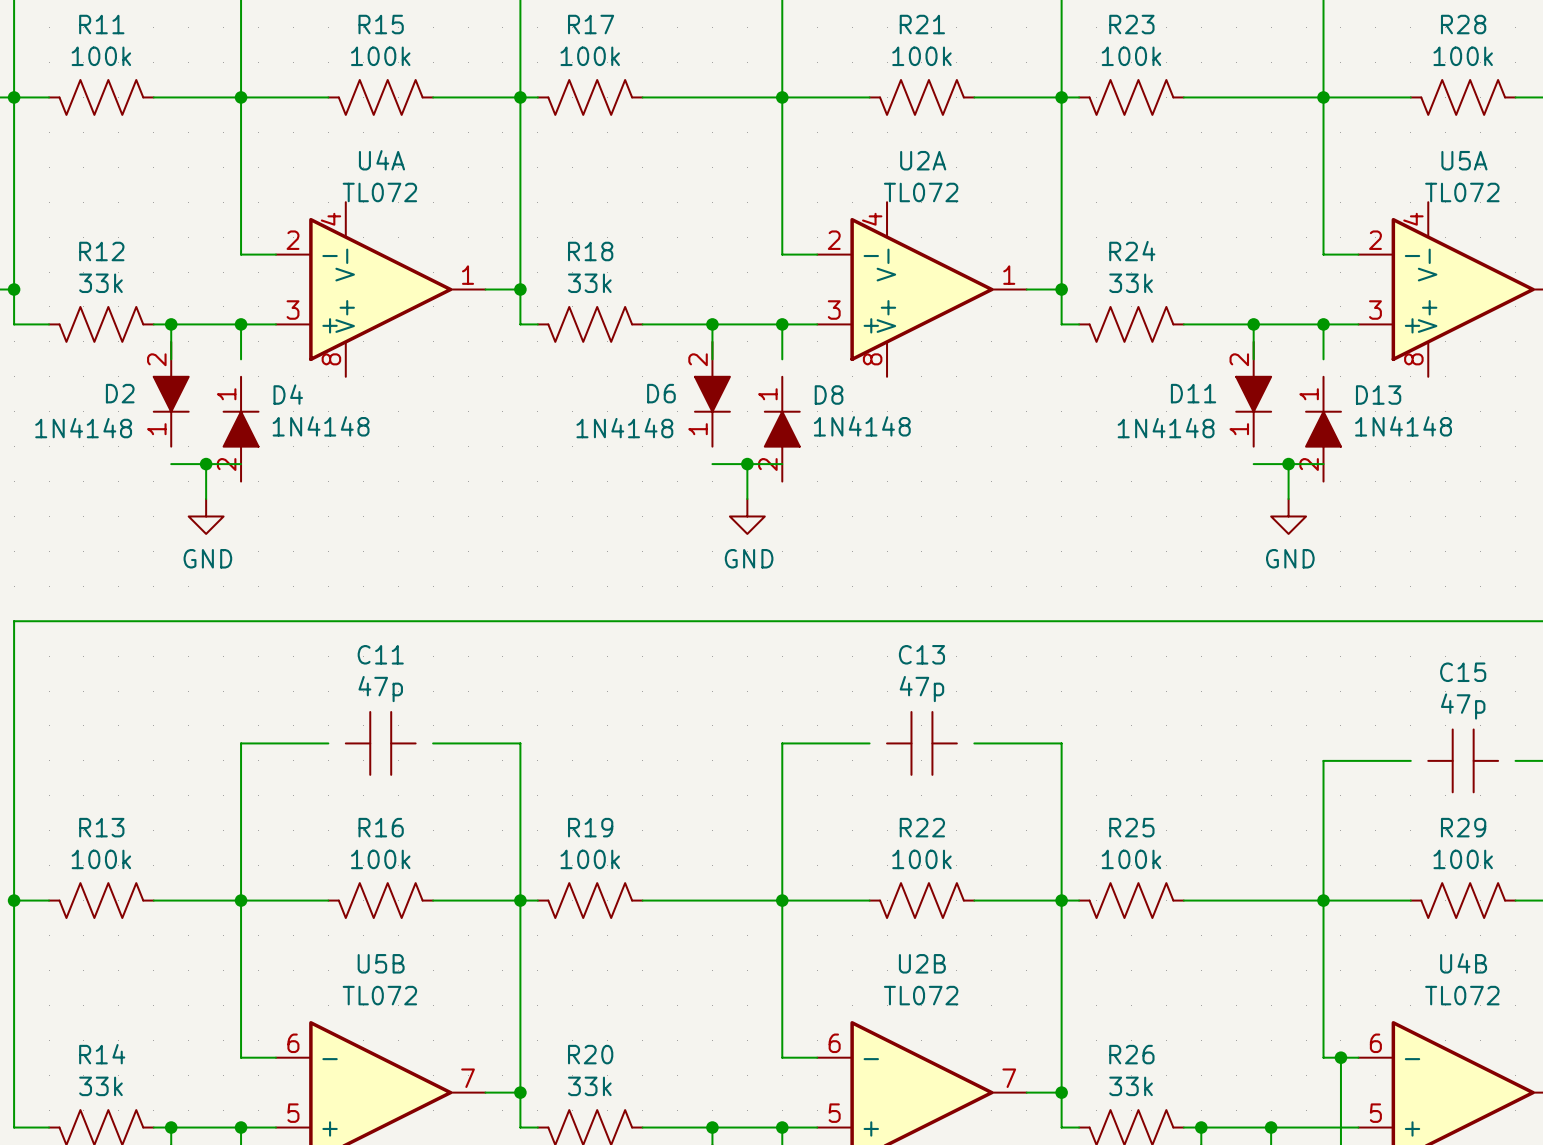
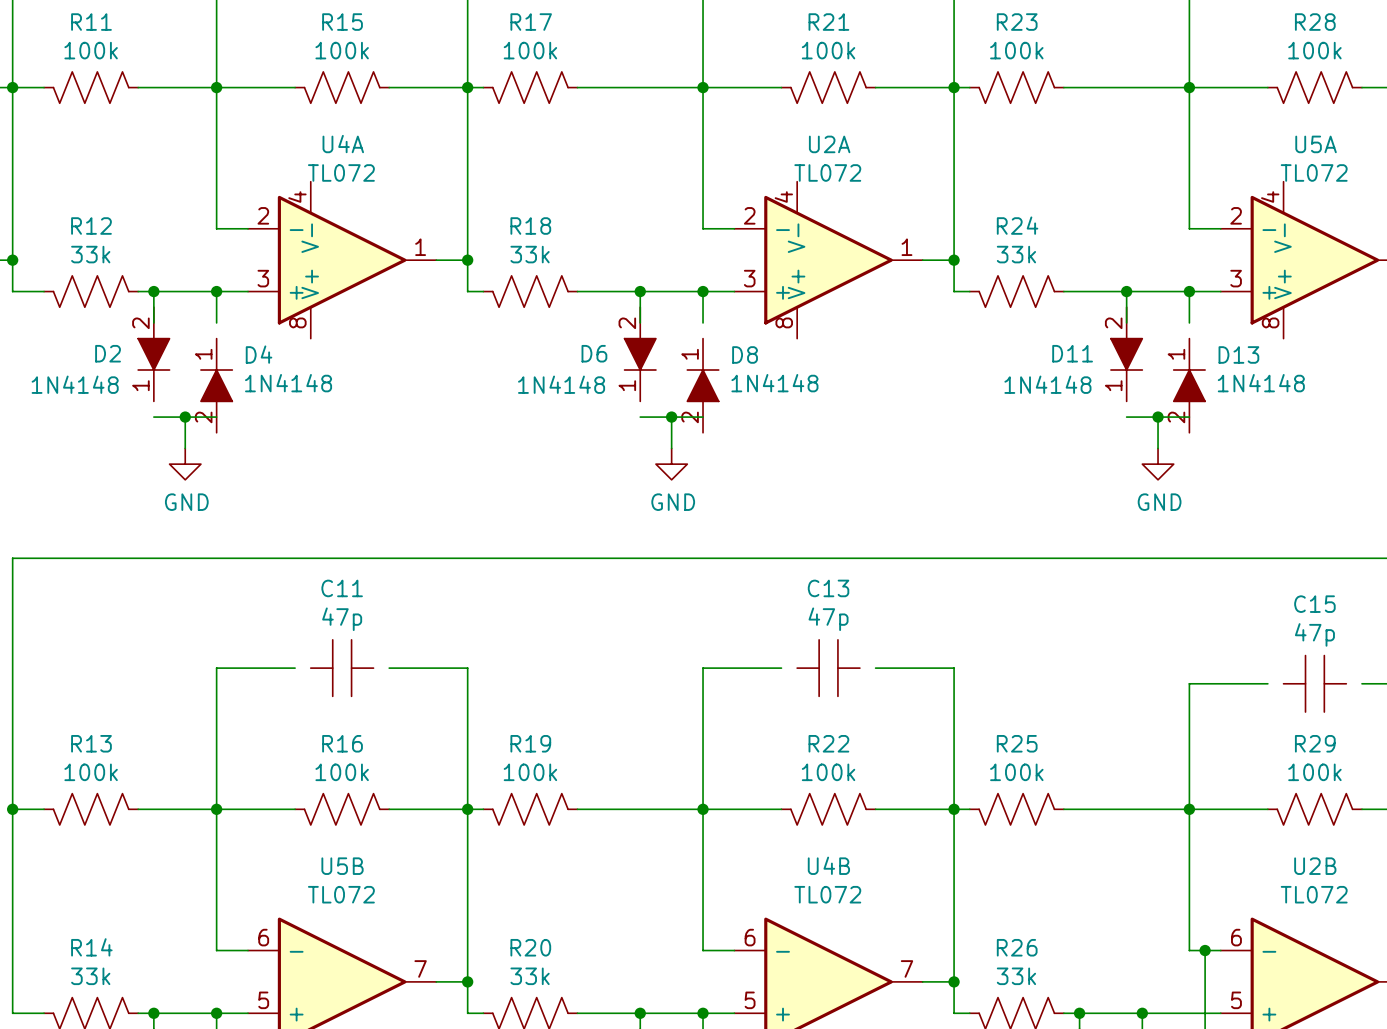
U2B name: U2B (922, 963) -> U4B (828, 865)
U4B name: U4B (1463, 963) -> U2B (1315, 866)

